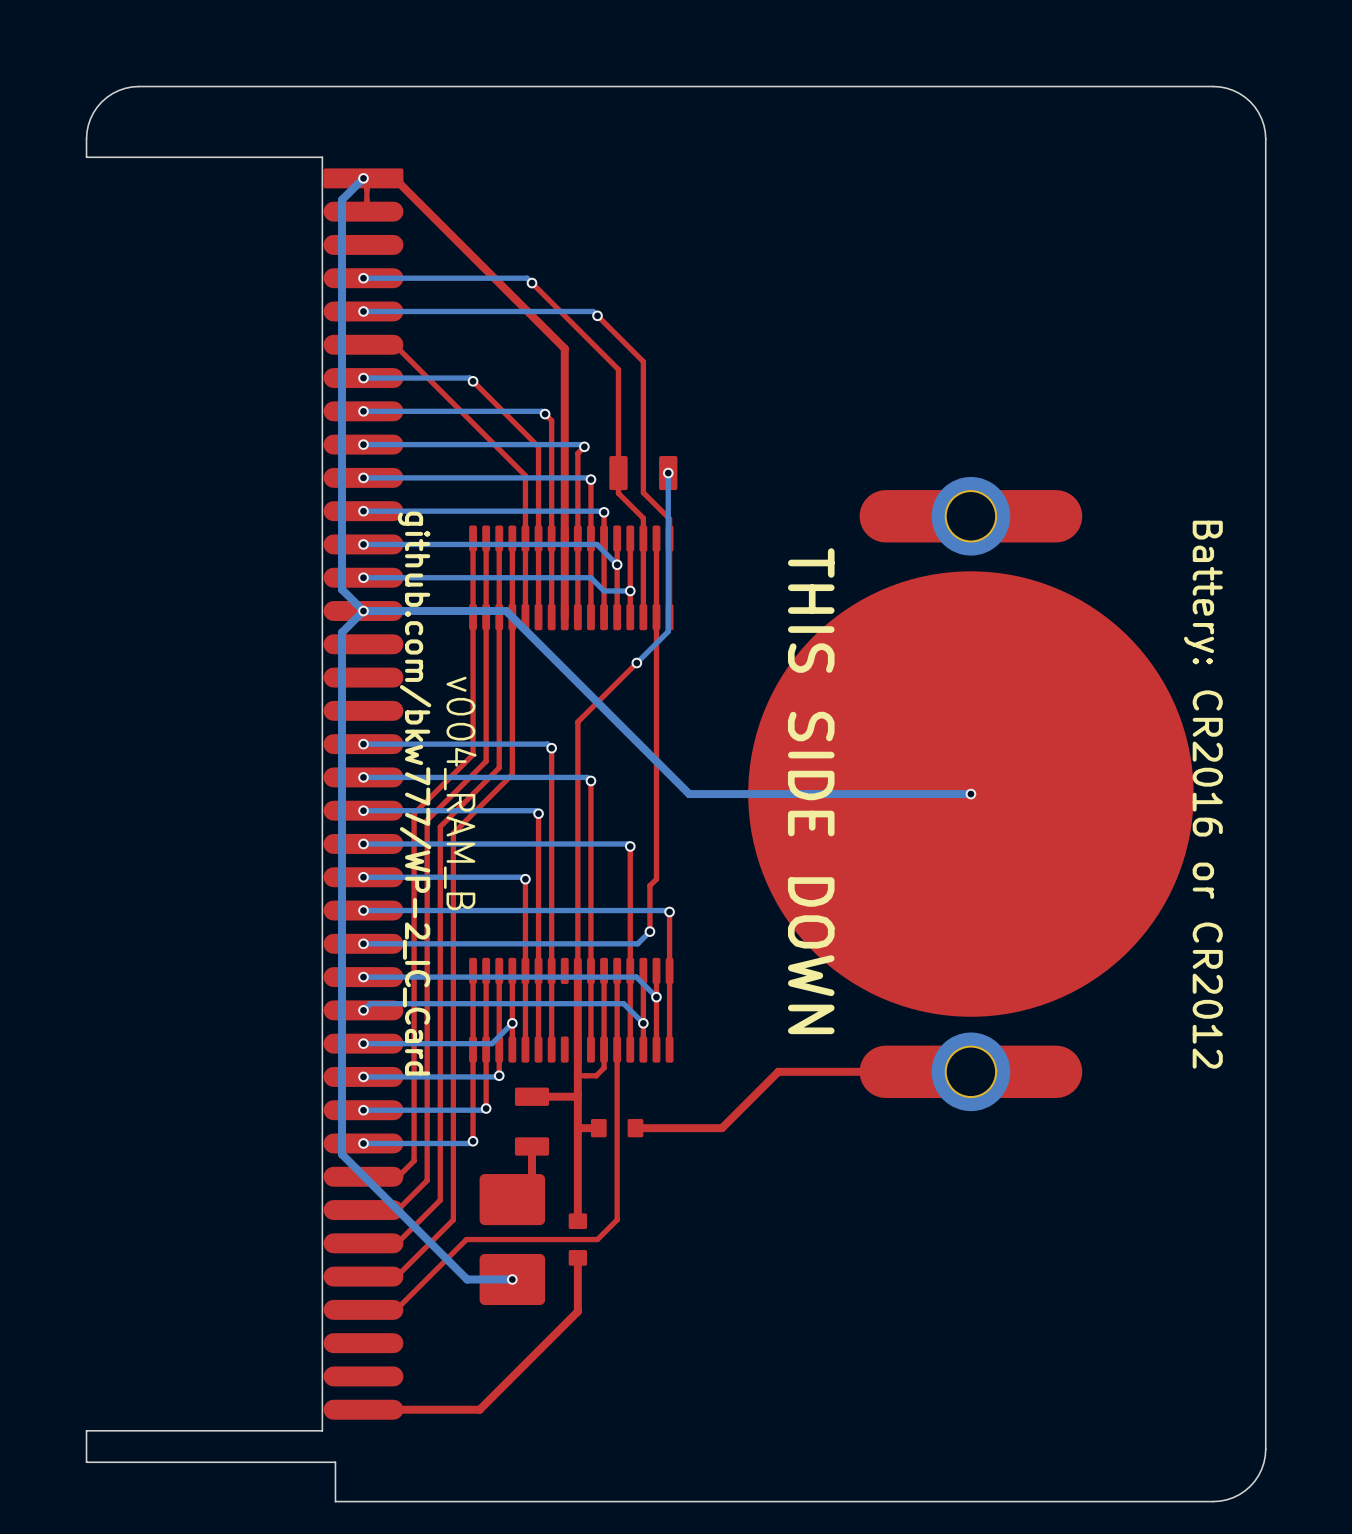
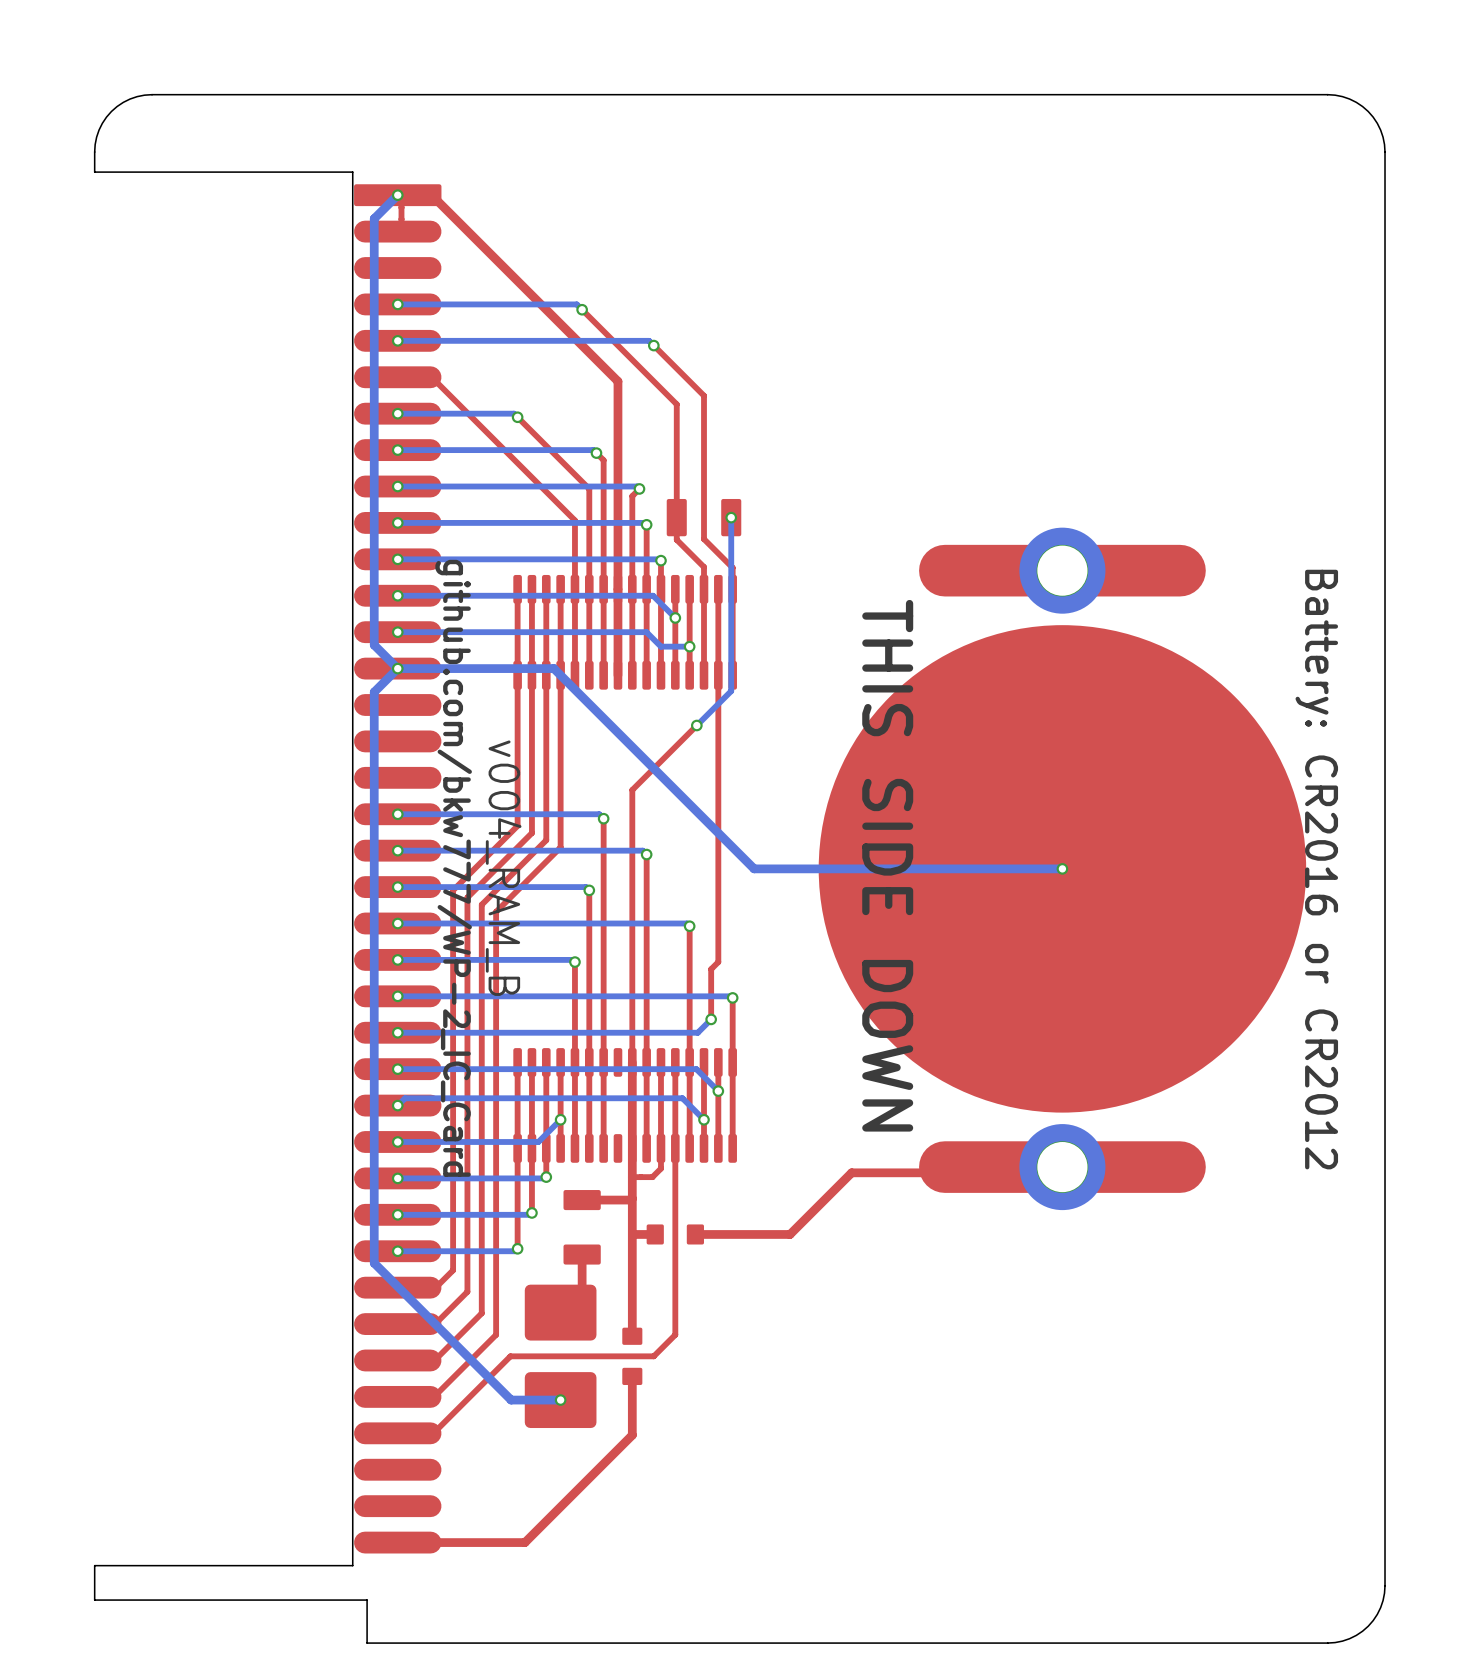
part footprint: [748, 476, 1194, 1112] -> [818, 527, 1307, 1211]

